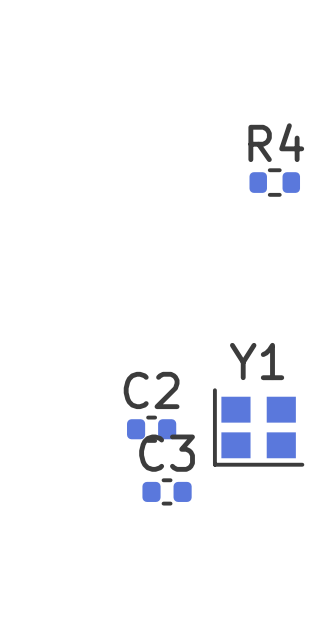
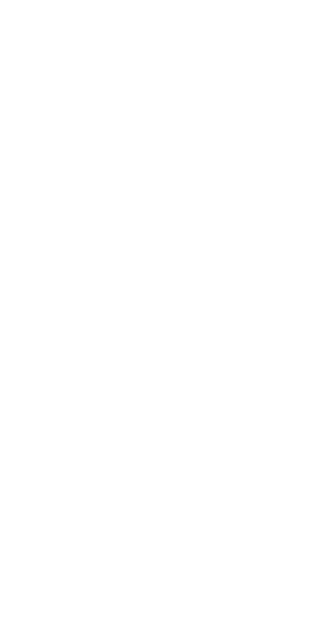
R4: (274, 182) -> none
Y1: (258, 427) -> none
C2: (151, 429) -> none
C3: (167, 491) -> none

